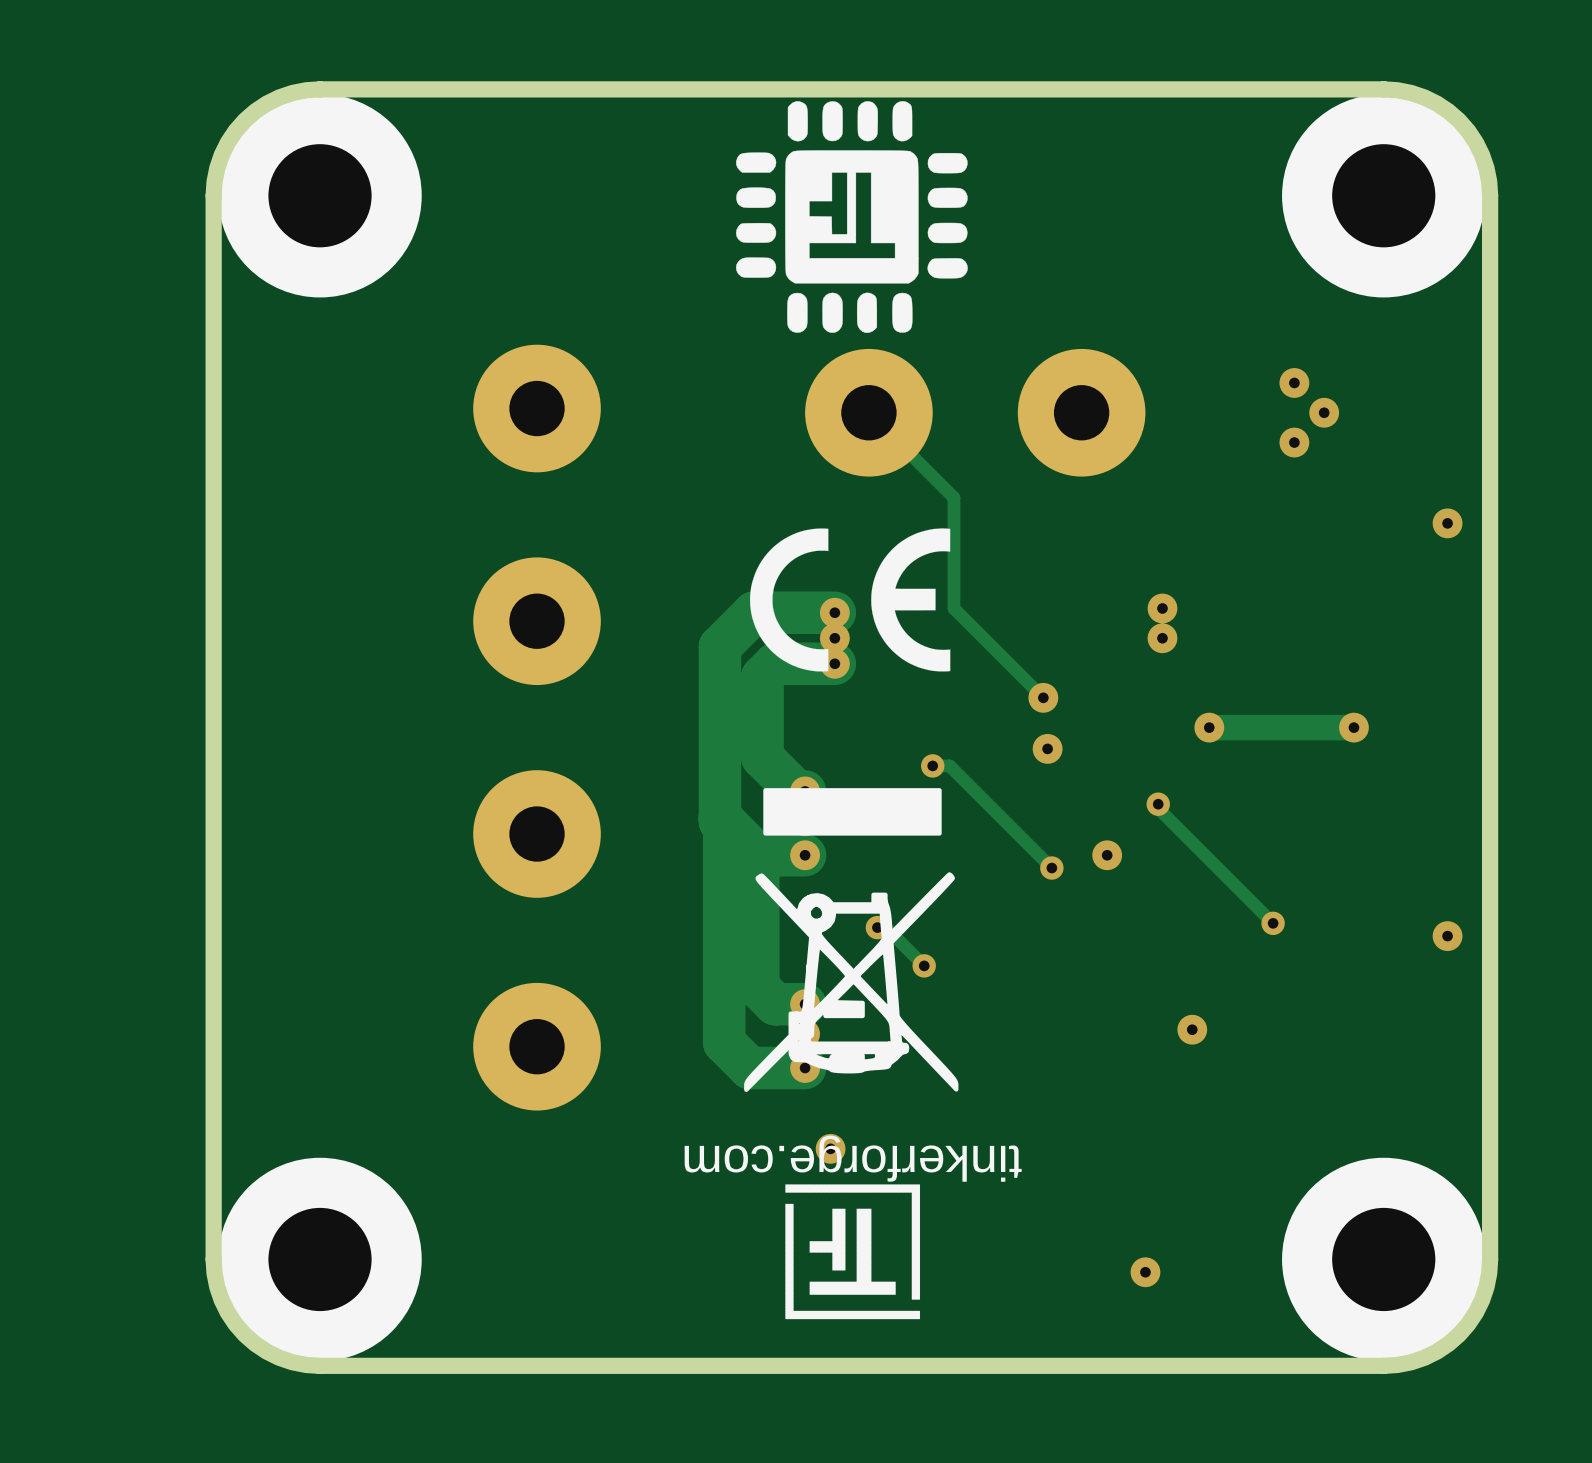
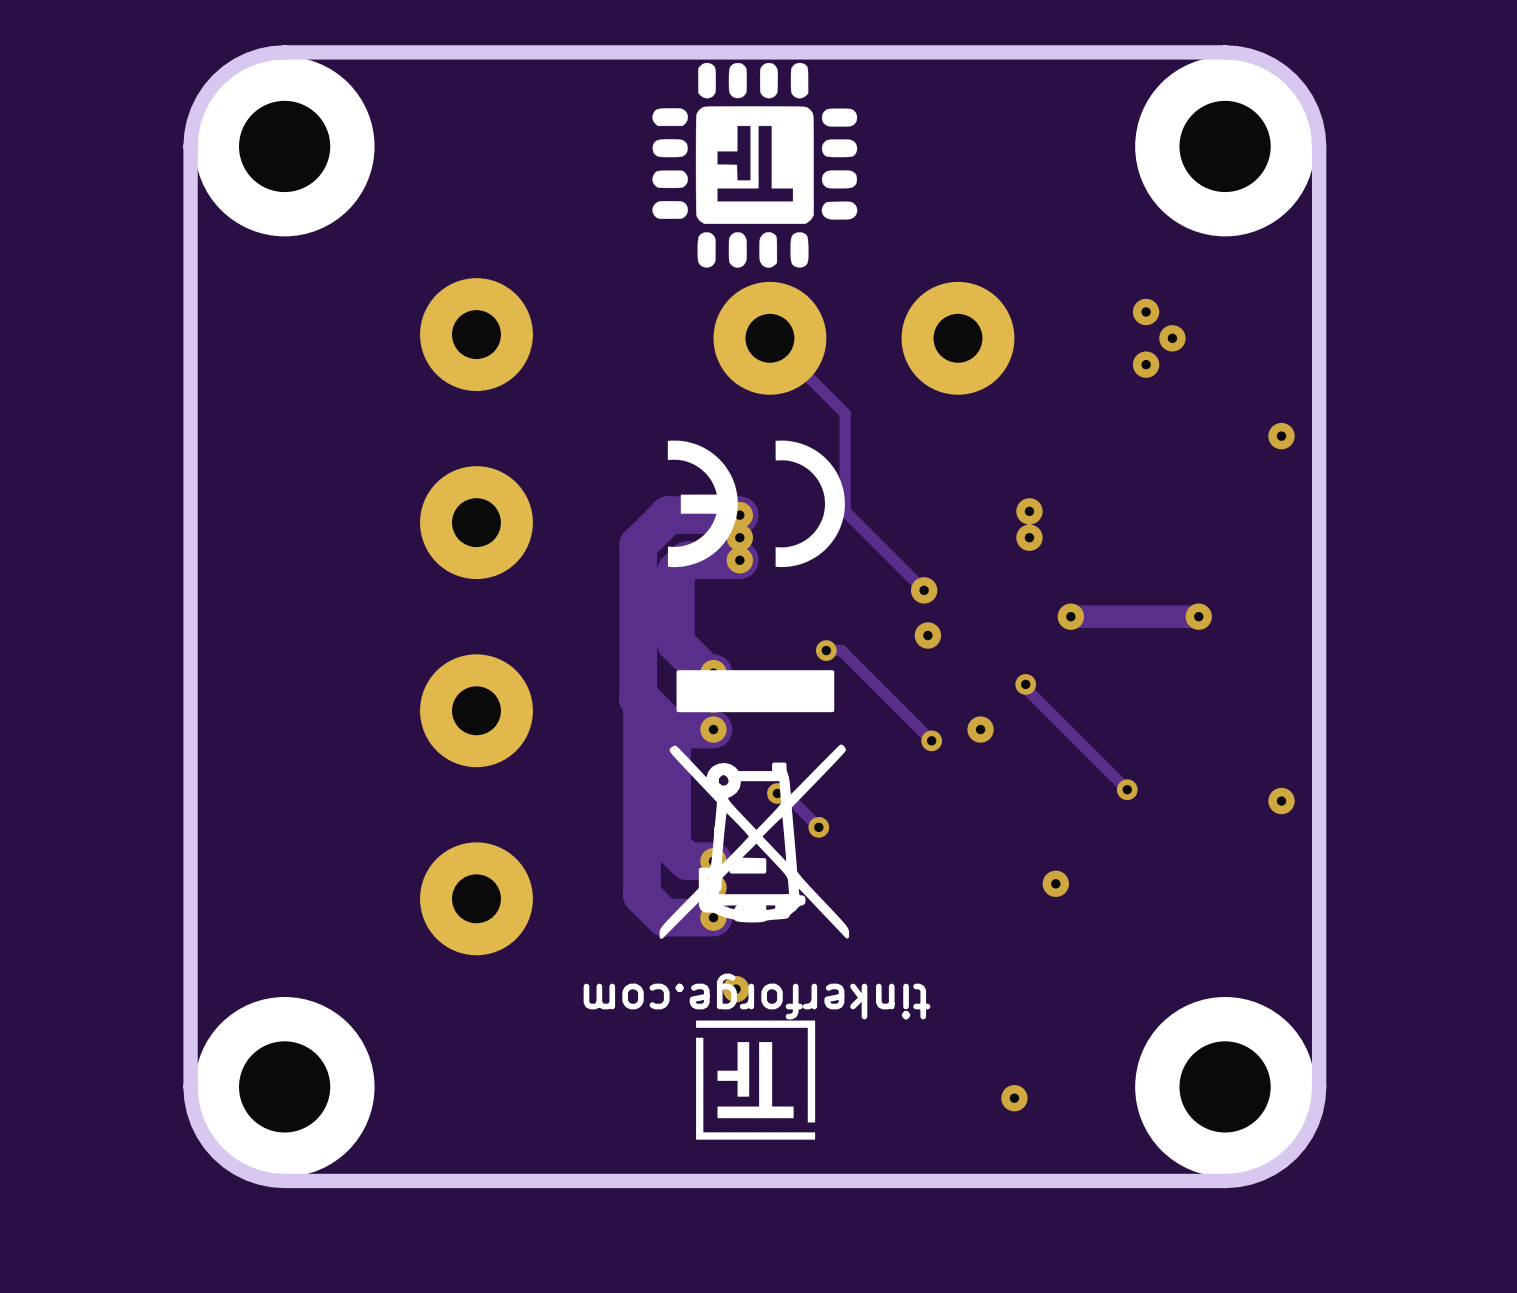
drawing shape: [750, 528, 951, 672] -> [667, 440, 845, 568]

